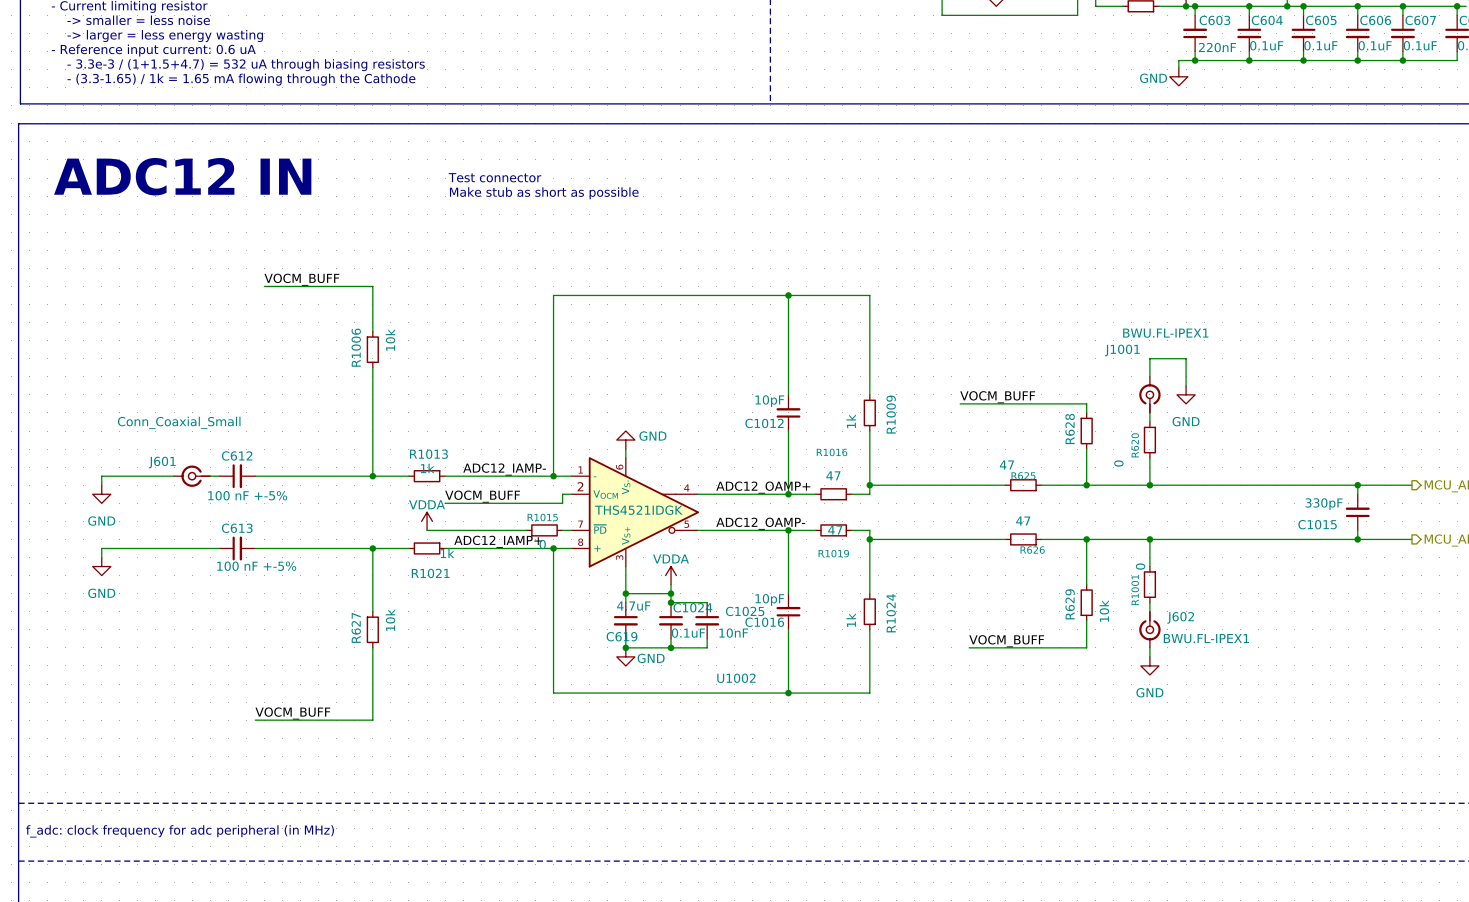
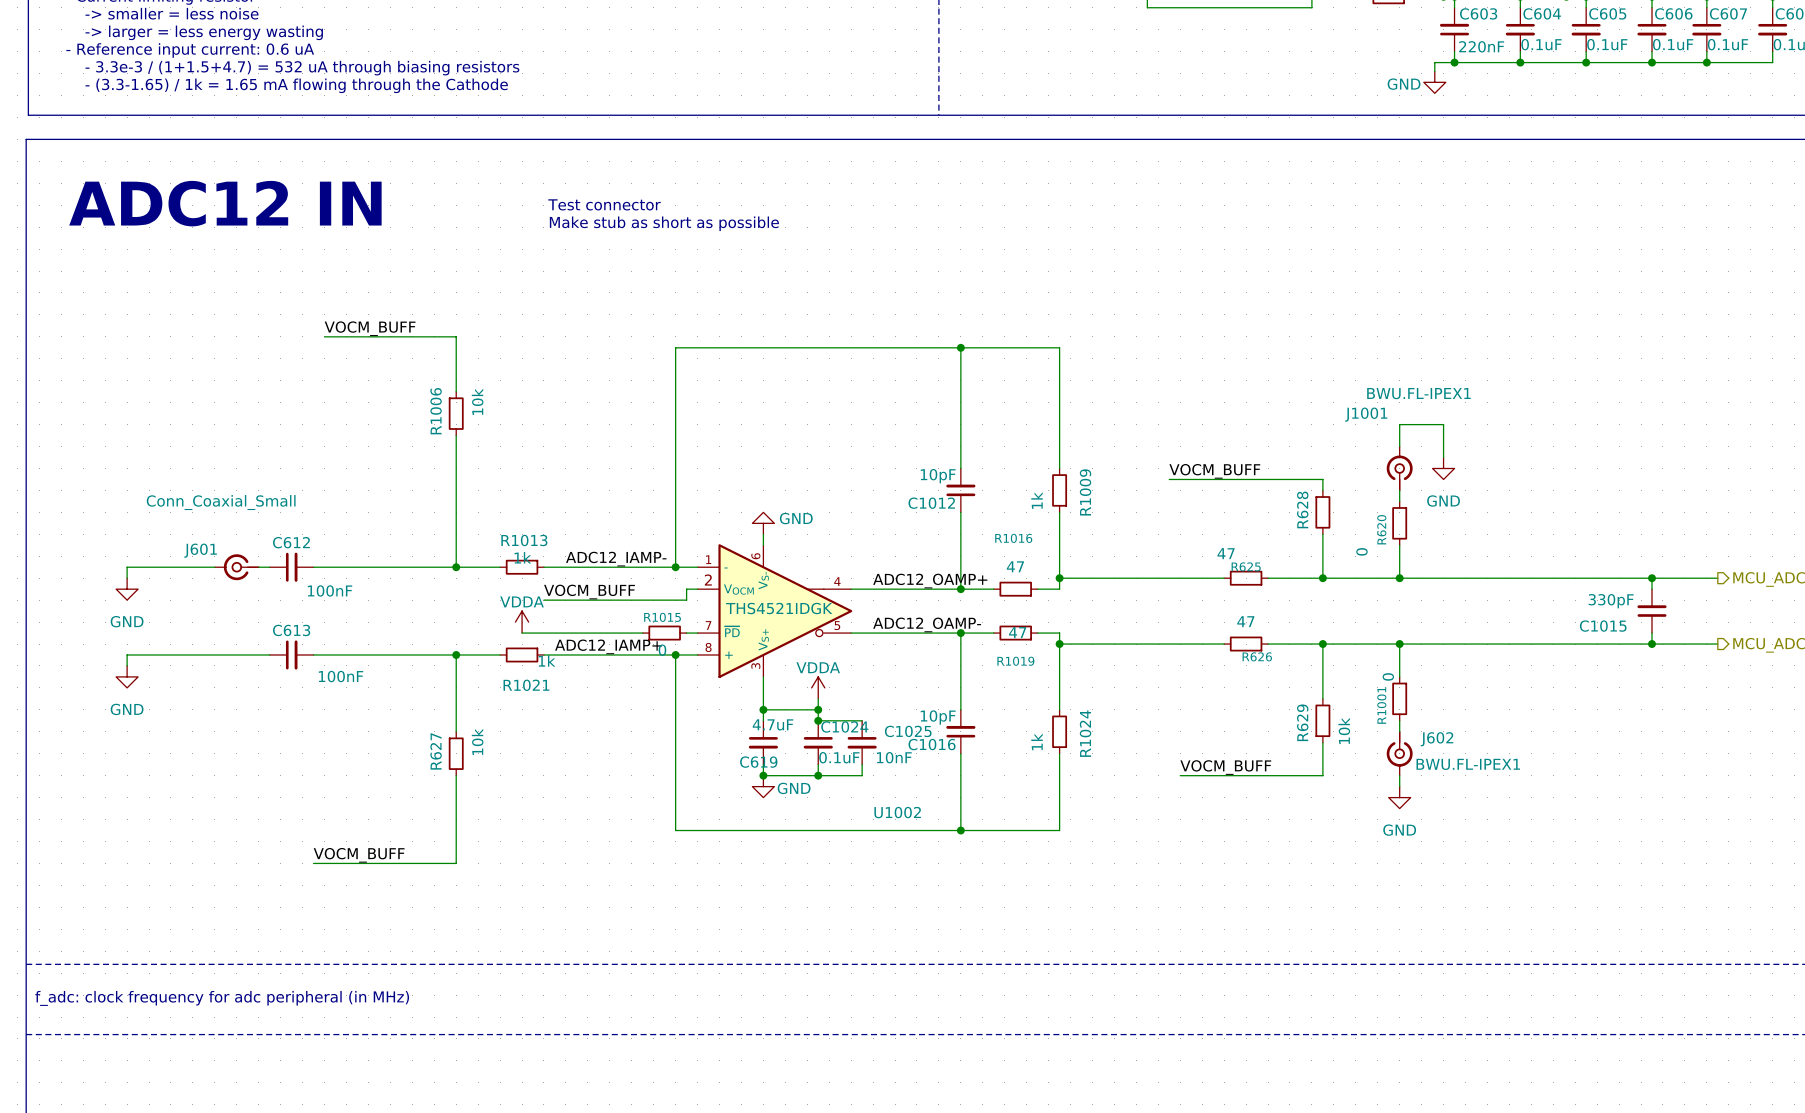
C612 value: 100 nF +-5% (247, 495) -> 100nF (330, 590)
C613 value: 100 nF +-5% (256, 566) -> 100nF (341, 676)

